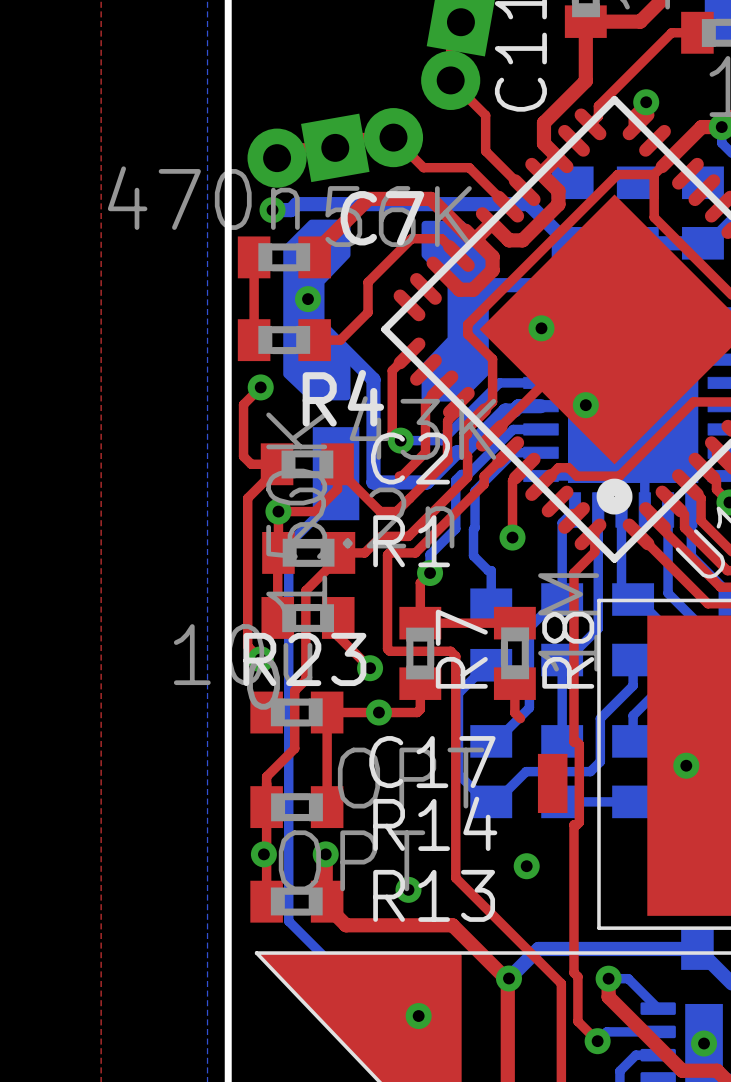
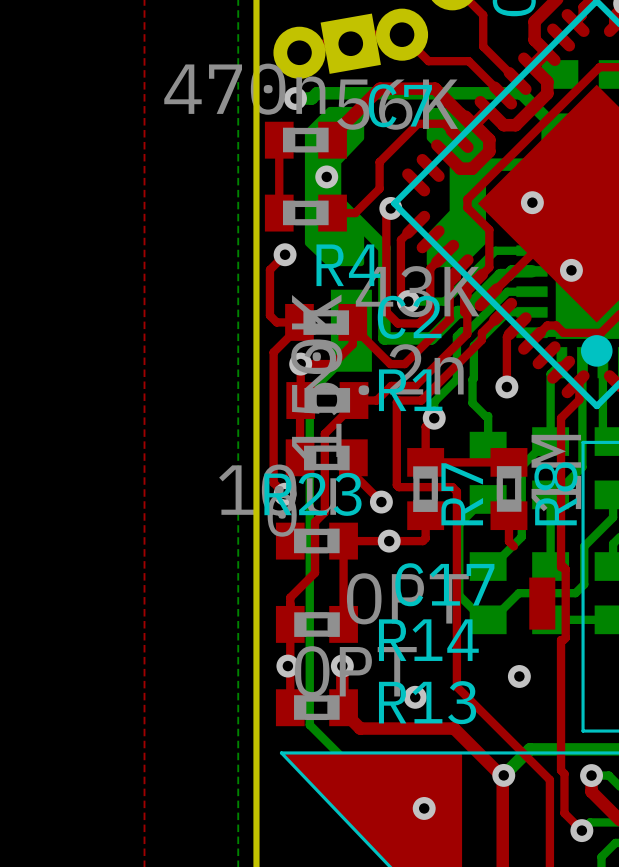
via: none -> (390, 208)
top track: (412, 465) (401, 476) (399, 476) -> (418, 323) (397, 323) (386, 311) (386, 212) (390, 208)

